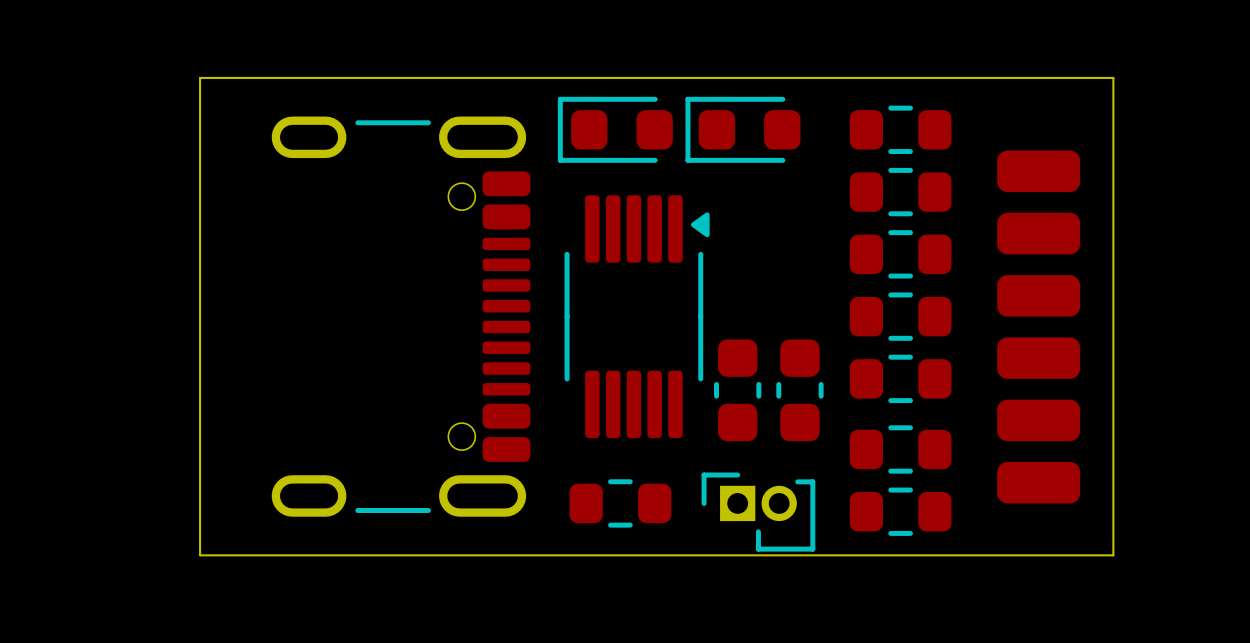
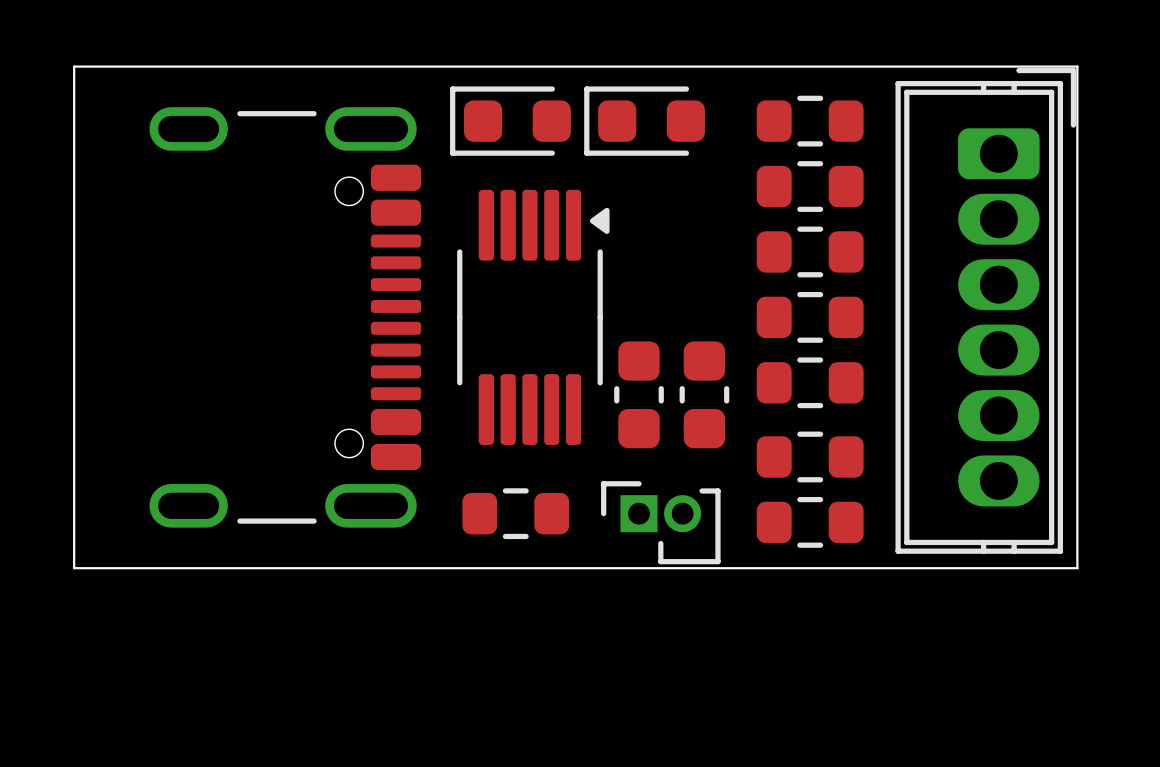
board edge: (1113, 77) (1113, 555) -> (1033, 66) (1077, 66) (1077, 568) (1033, 568)
part: (1038, 171) -> none
part: (1038, 233) -> none
part: (1038, 295) -> none
part: none -> (985, 310)
part: (1038, 358) -> none
part: (1038, 420) -> none
part: (1038, 482) -> none

